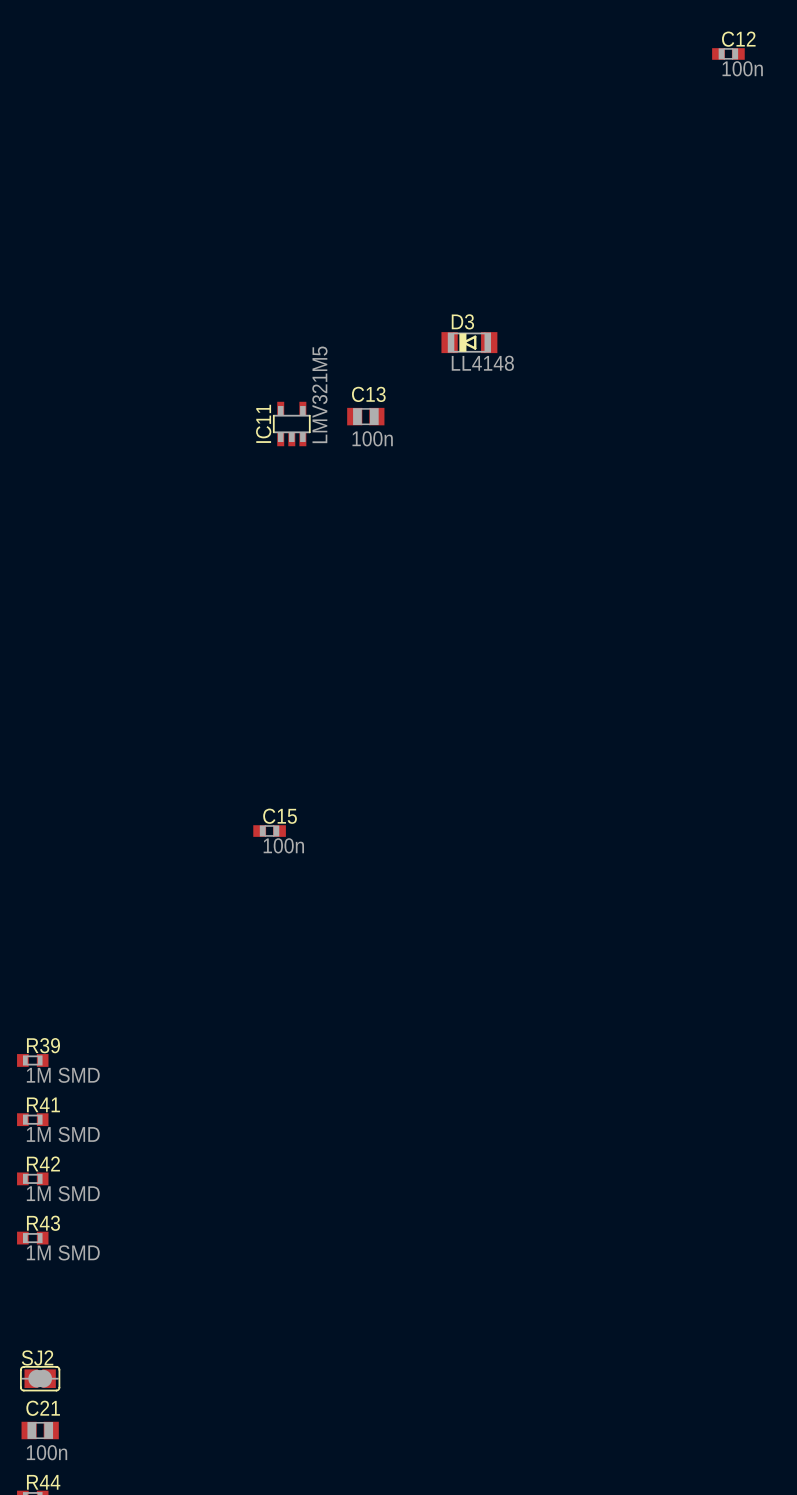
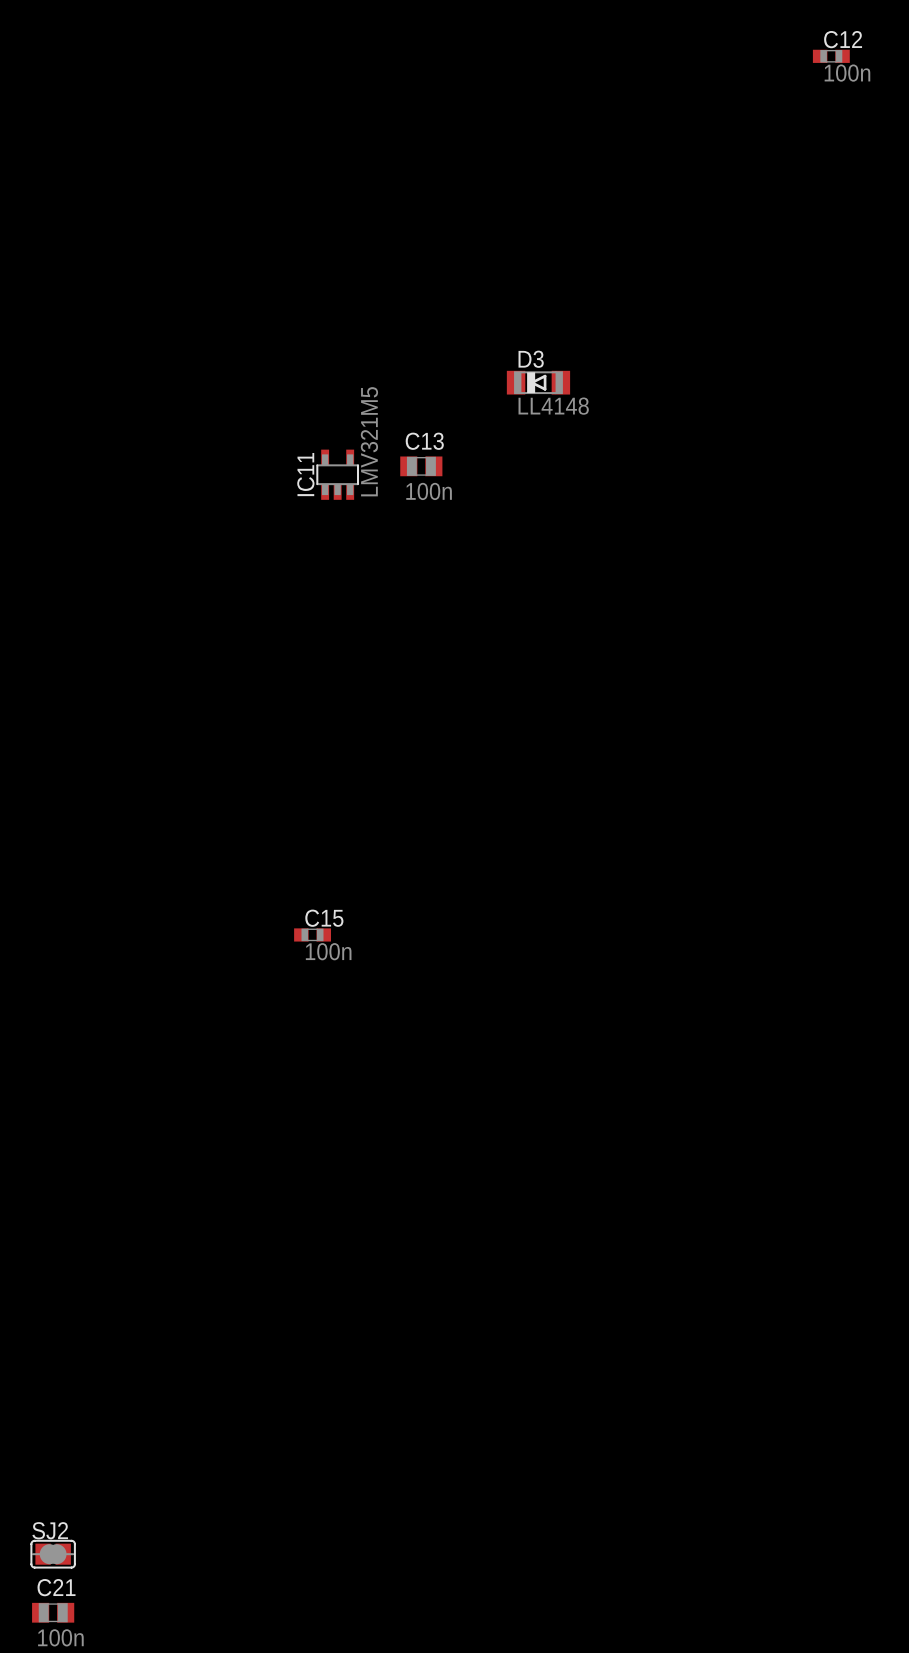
R39: 1M SMD (32, 1060) -> none
R41: 1M SMD (32, 1119) -> none
R42: 1M SMD (32, 1178) -> none
R43: 1M SMD (32, 1238) -> none

